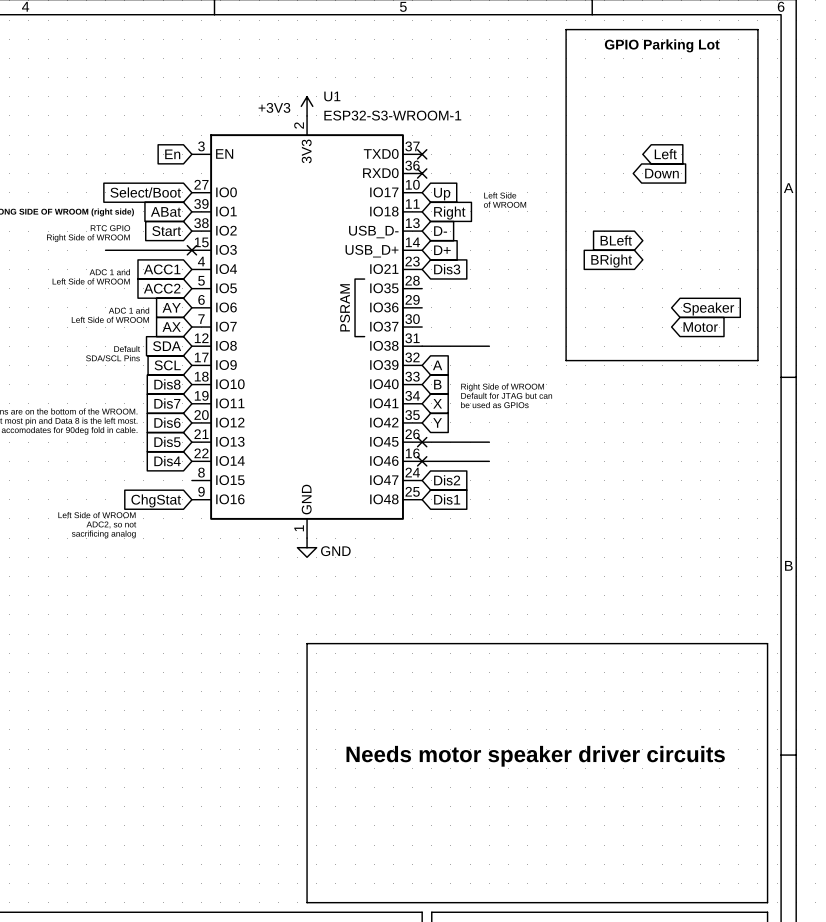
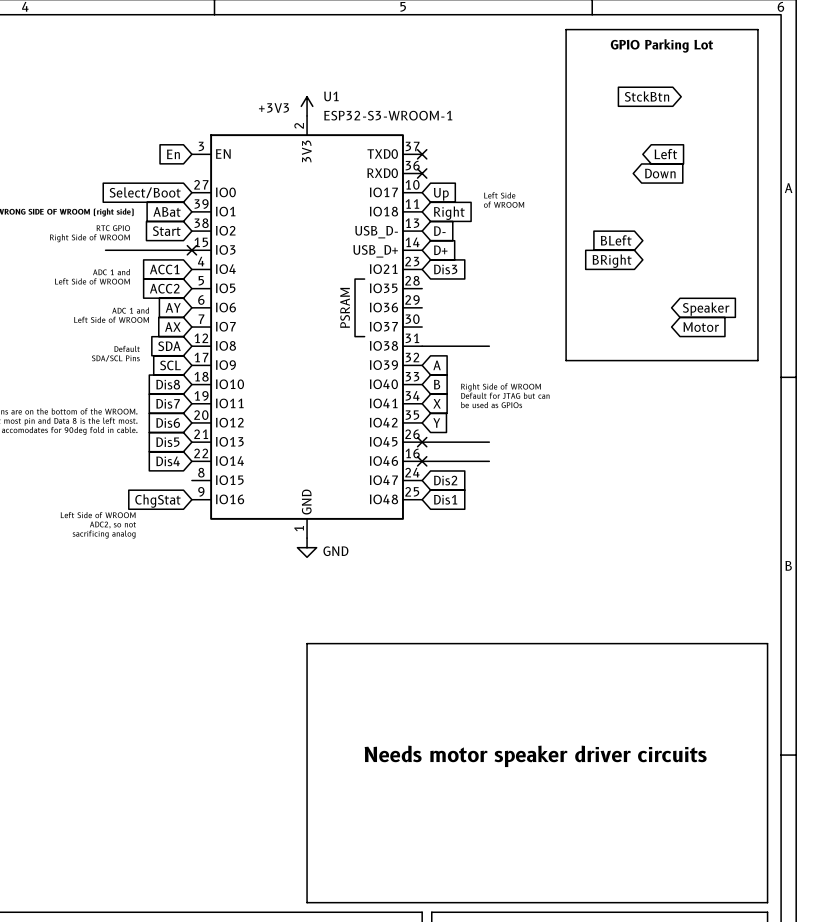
global label: none -> StckBtn (647, 96)

